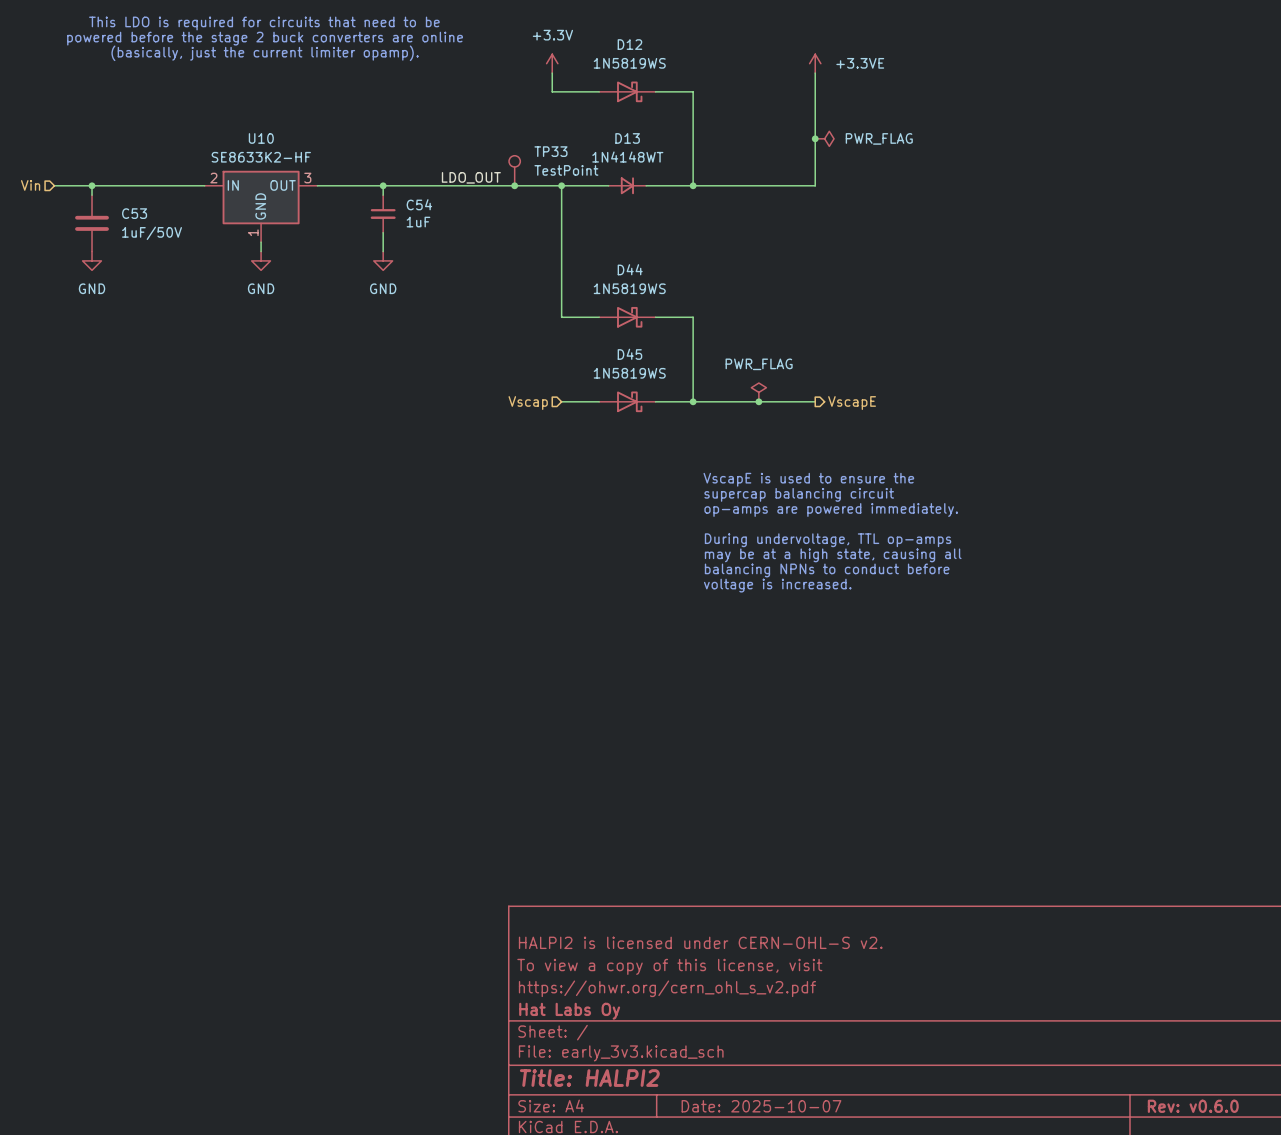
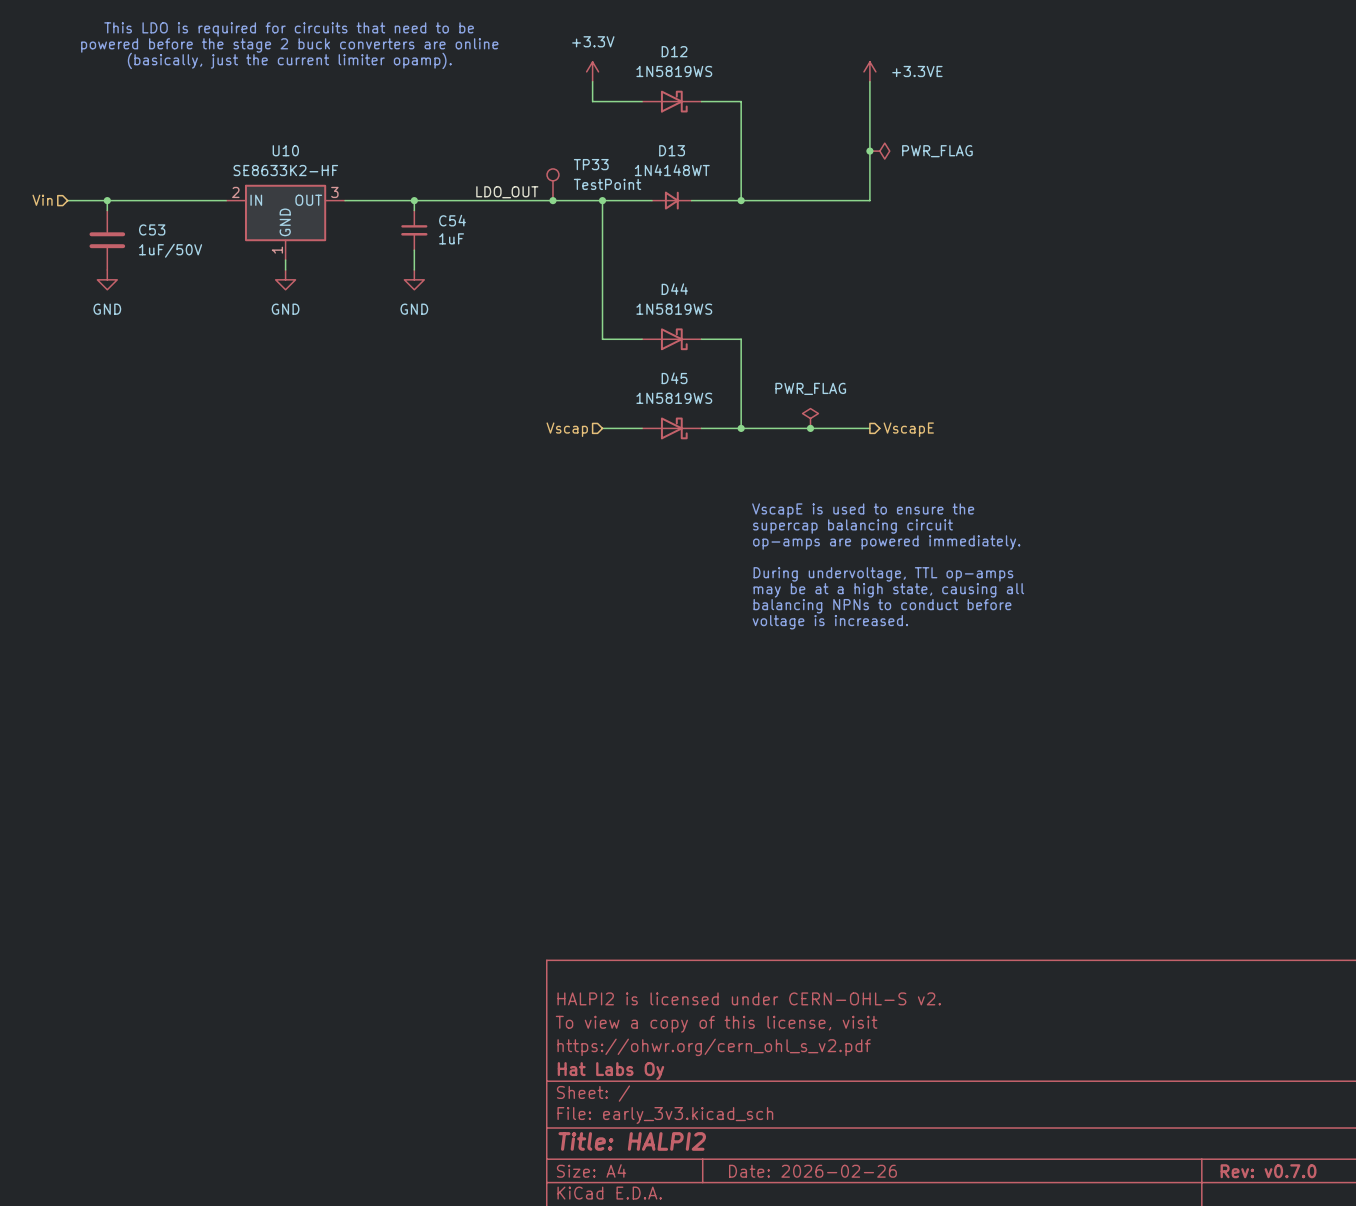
title block: Date: 2025-10-07 (761, 1106) -> Date: 2026-02-26 (812, 1171)
title block: Rev: v0.6.0 (1193, 1106) -> Rev: v0.7.0 (1268, 1171)

